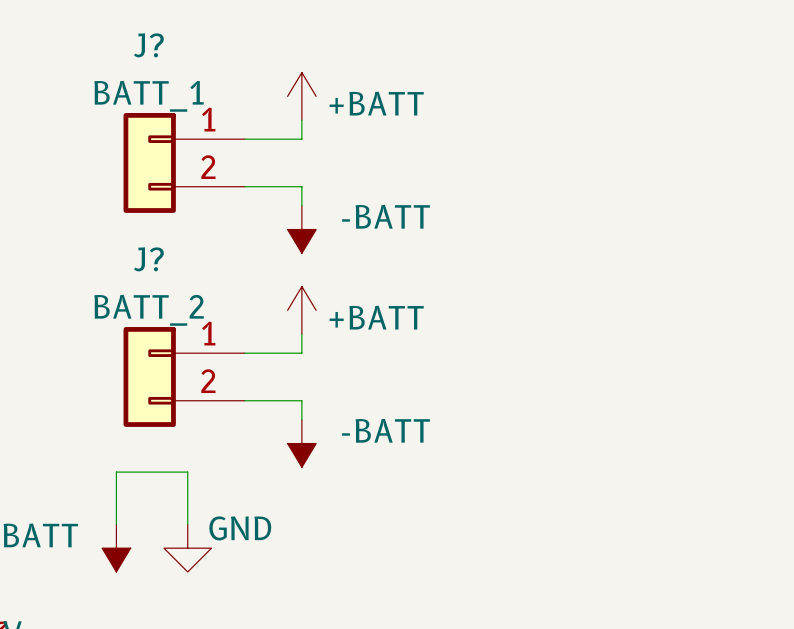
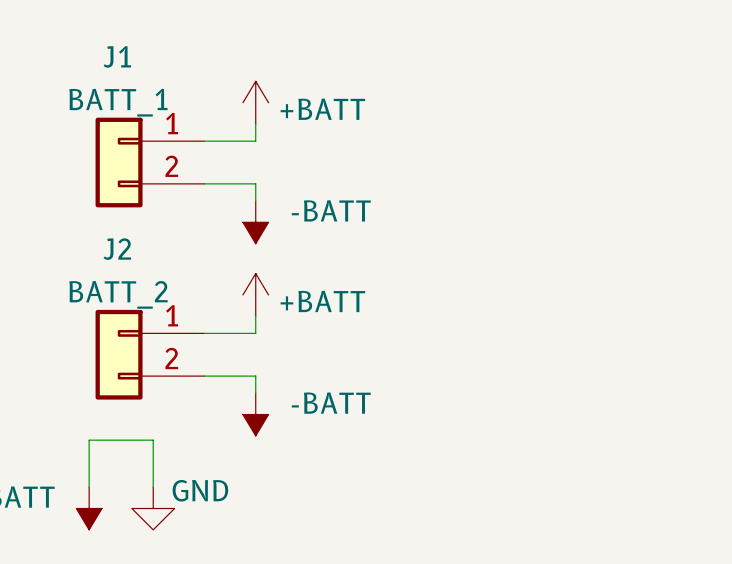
J? name: J? (148, 45) -> J1 (117, 56)
J? name: J? (148, 259) -> J2 (117, 249)

